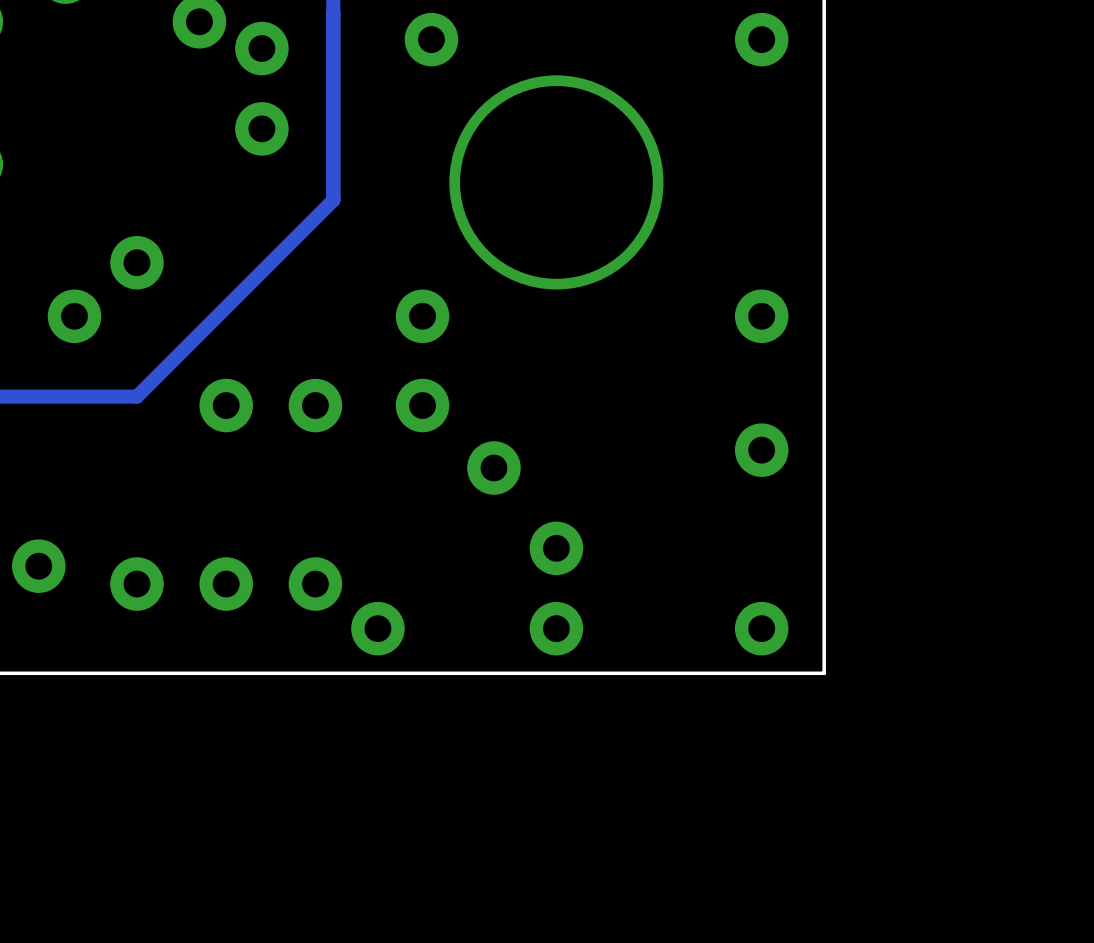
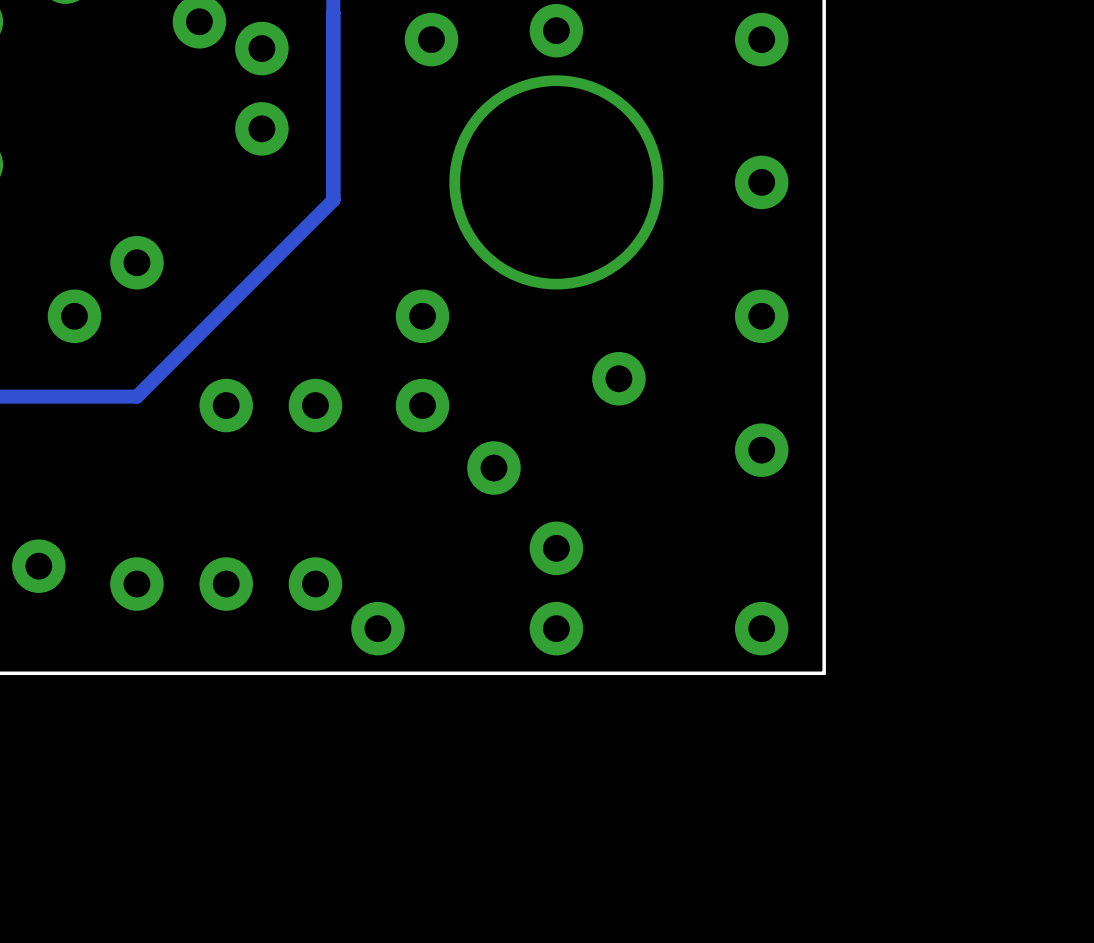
via: none -> (556, 30)
via: none -> (761, 182)
via: none -> (618, 378)

